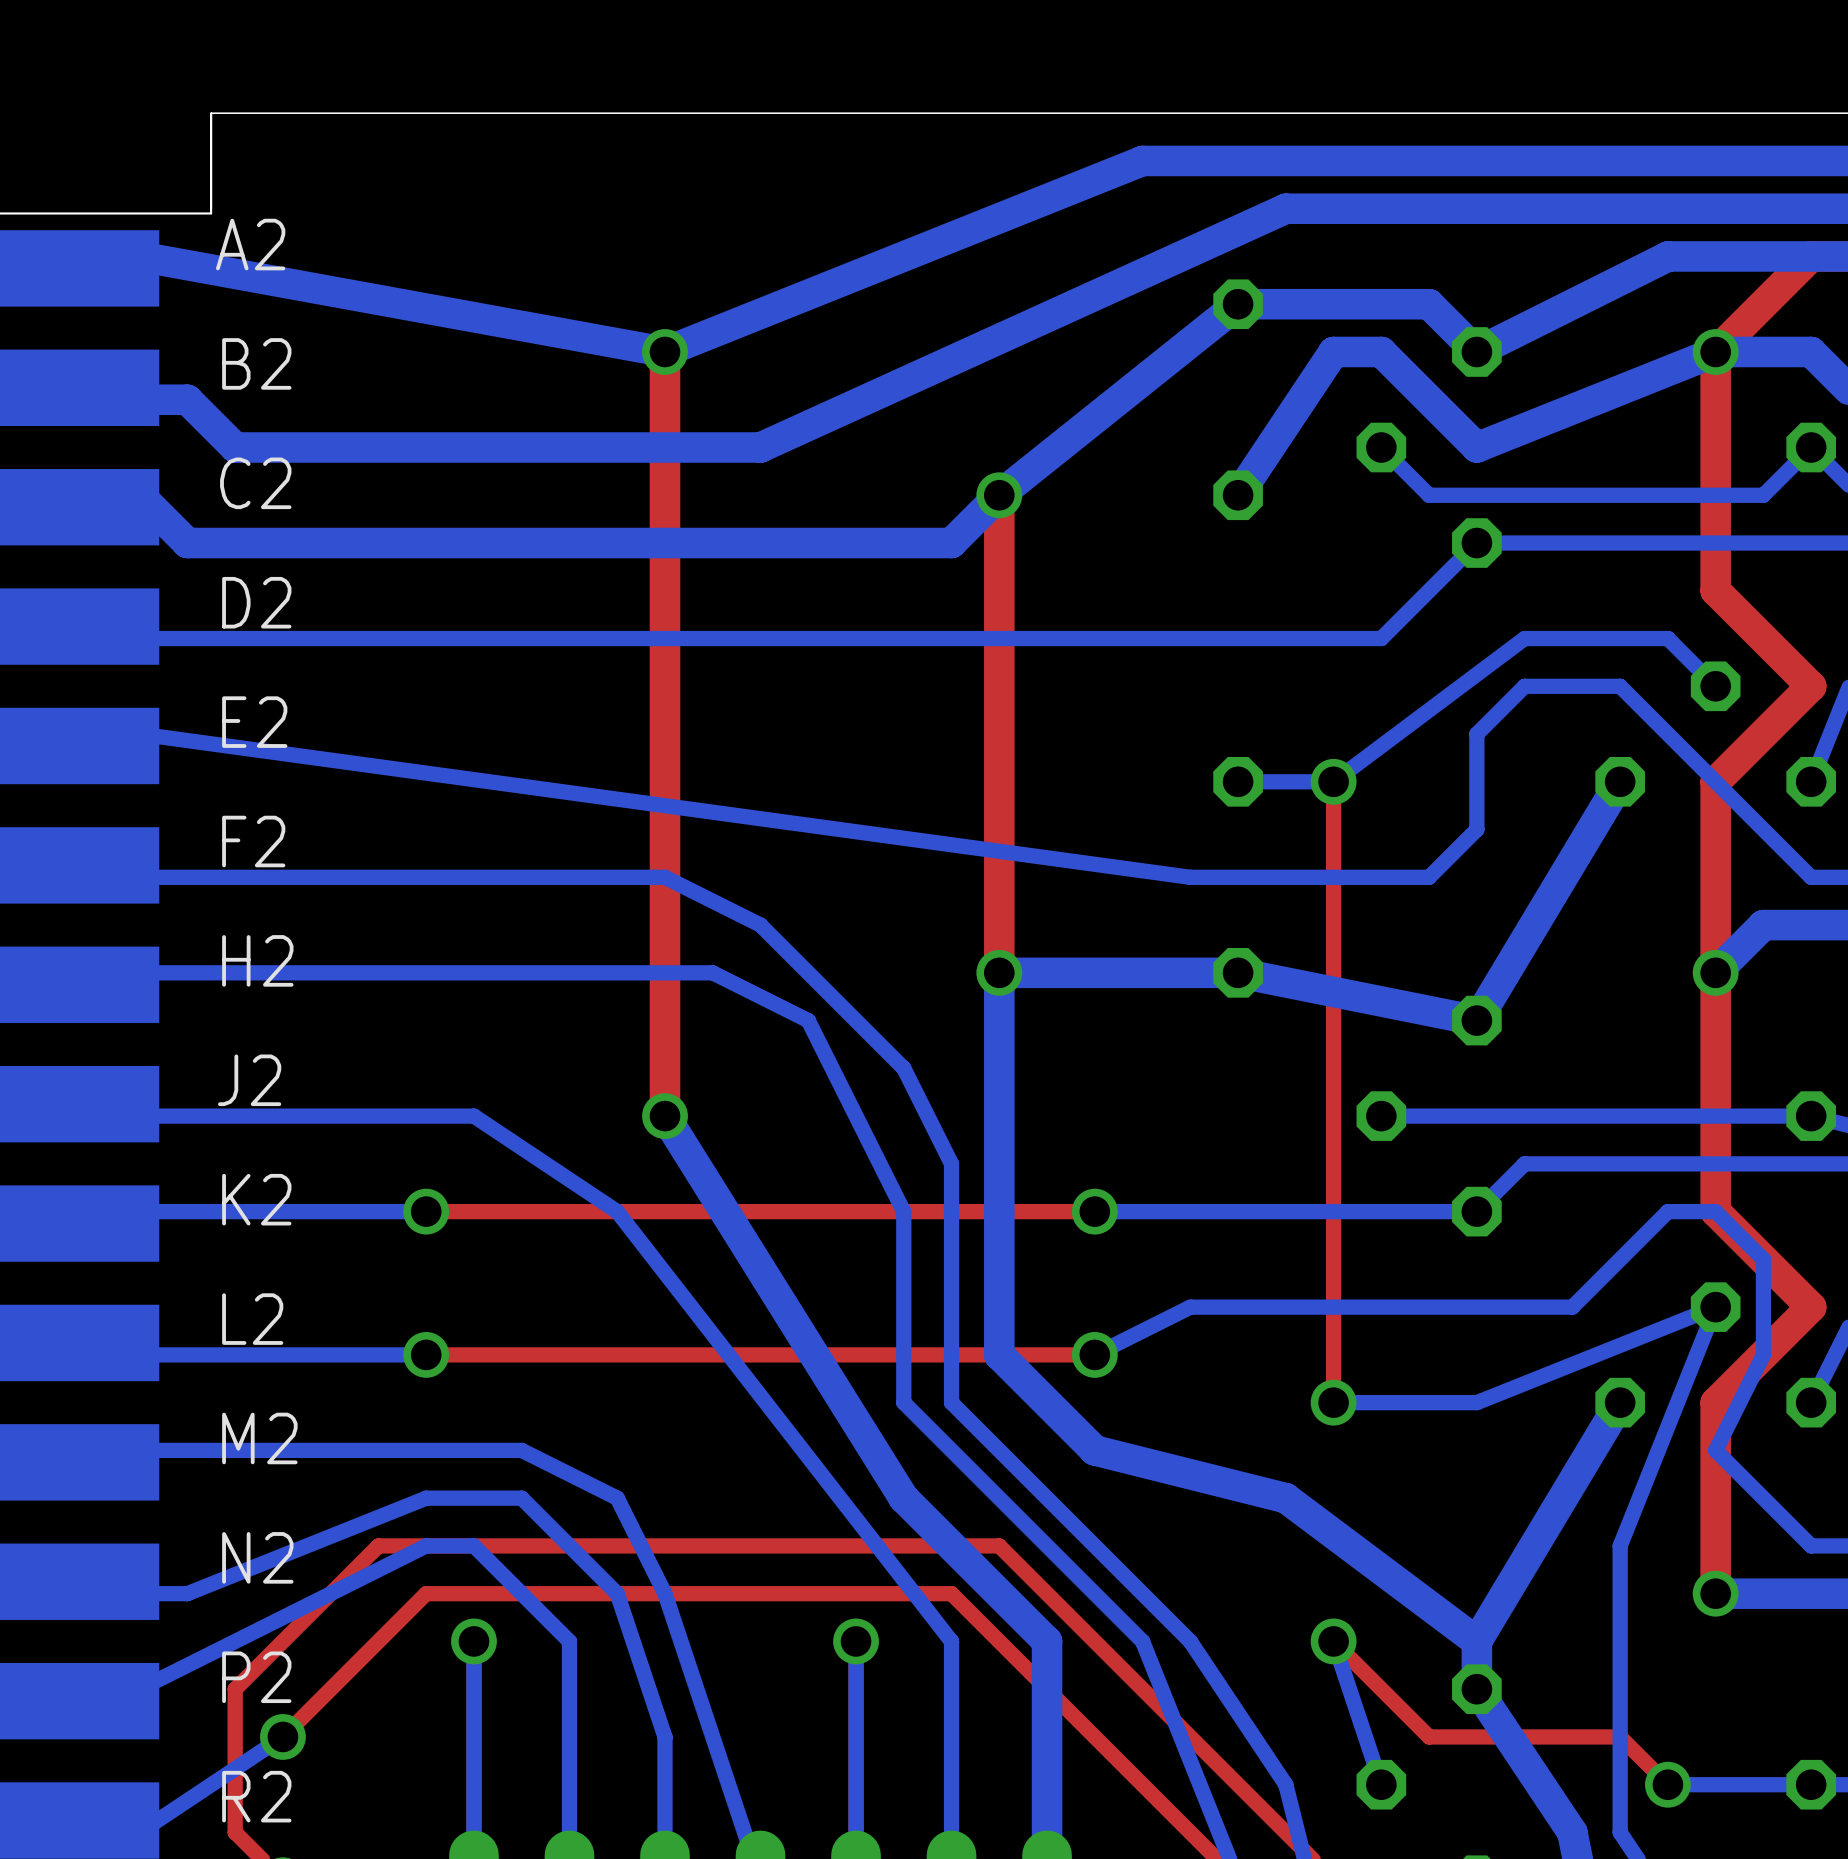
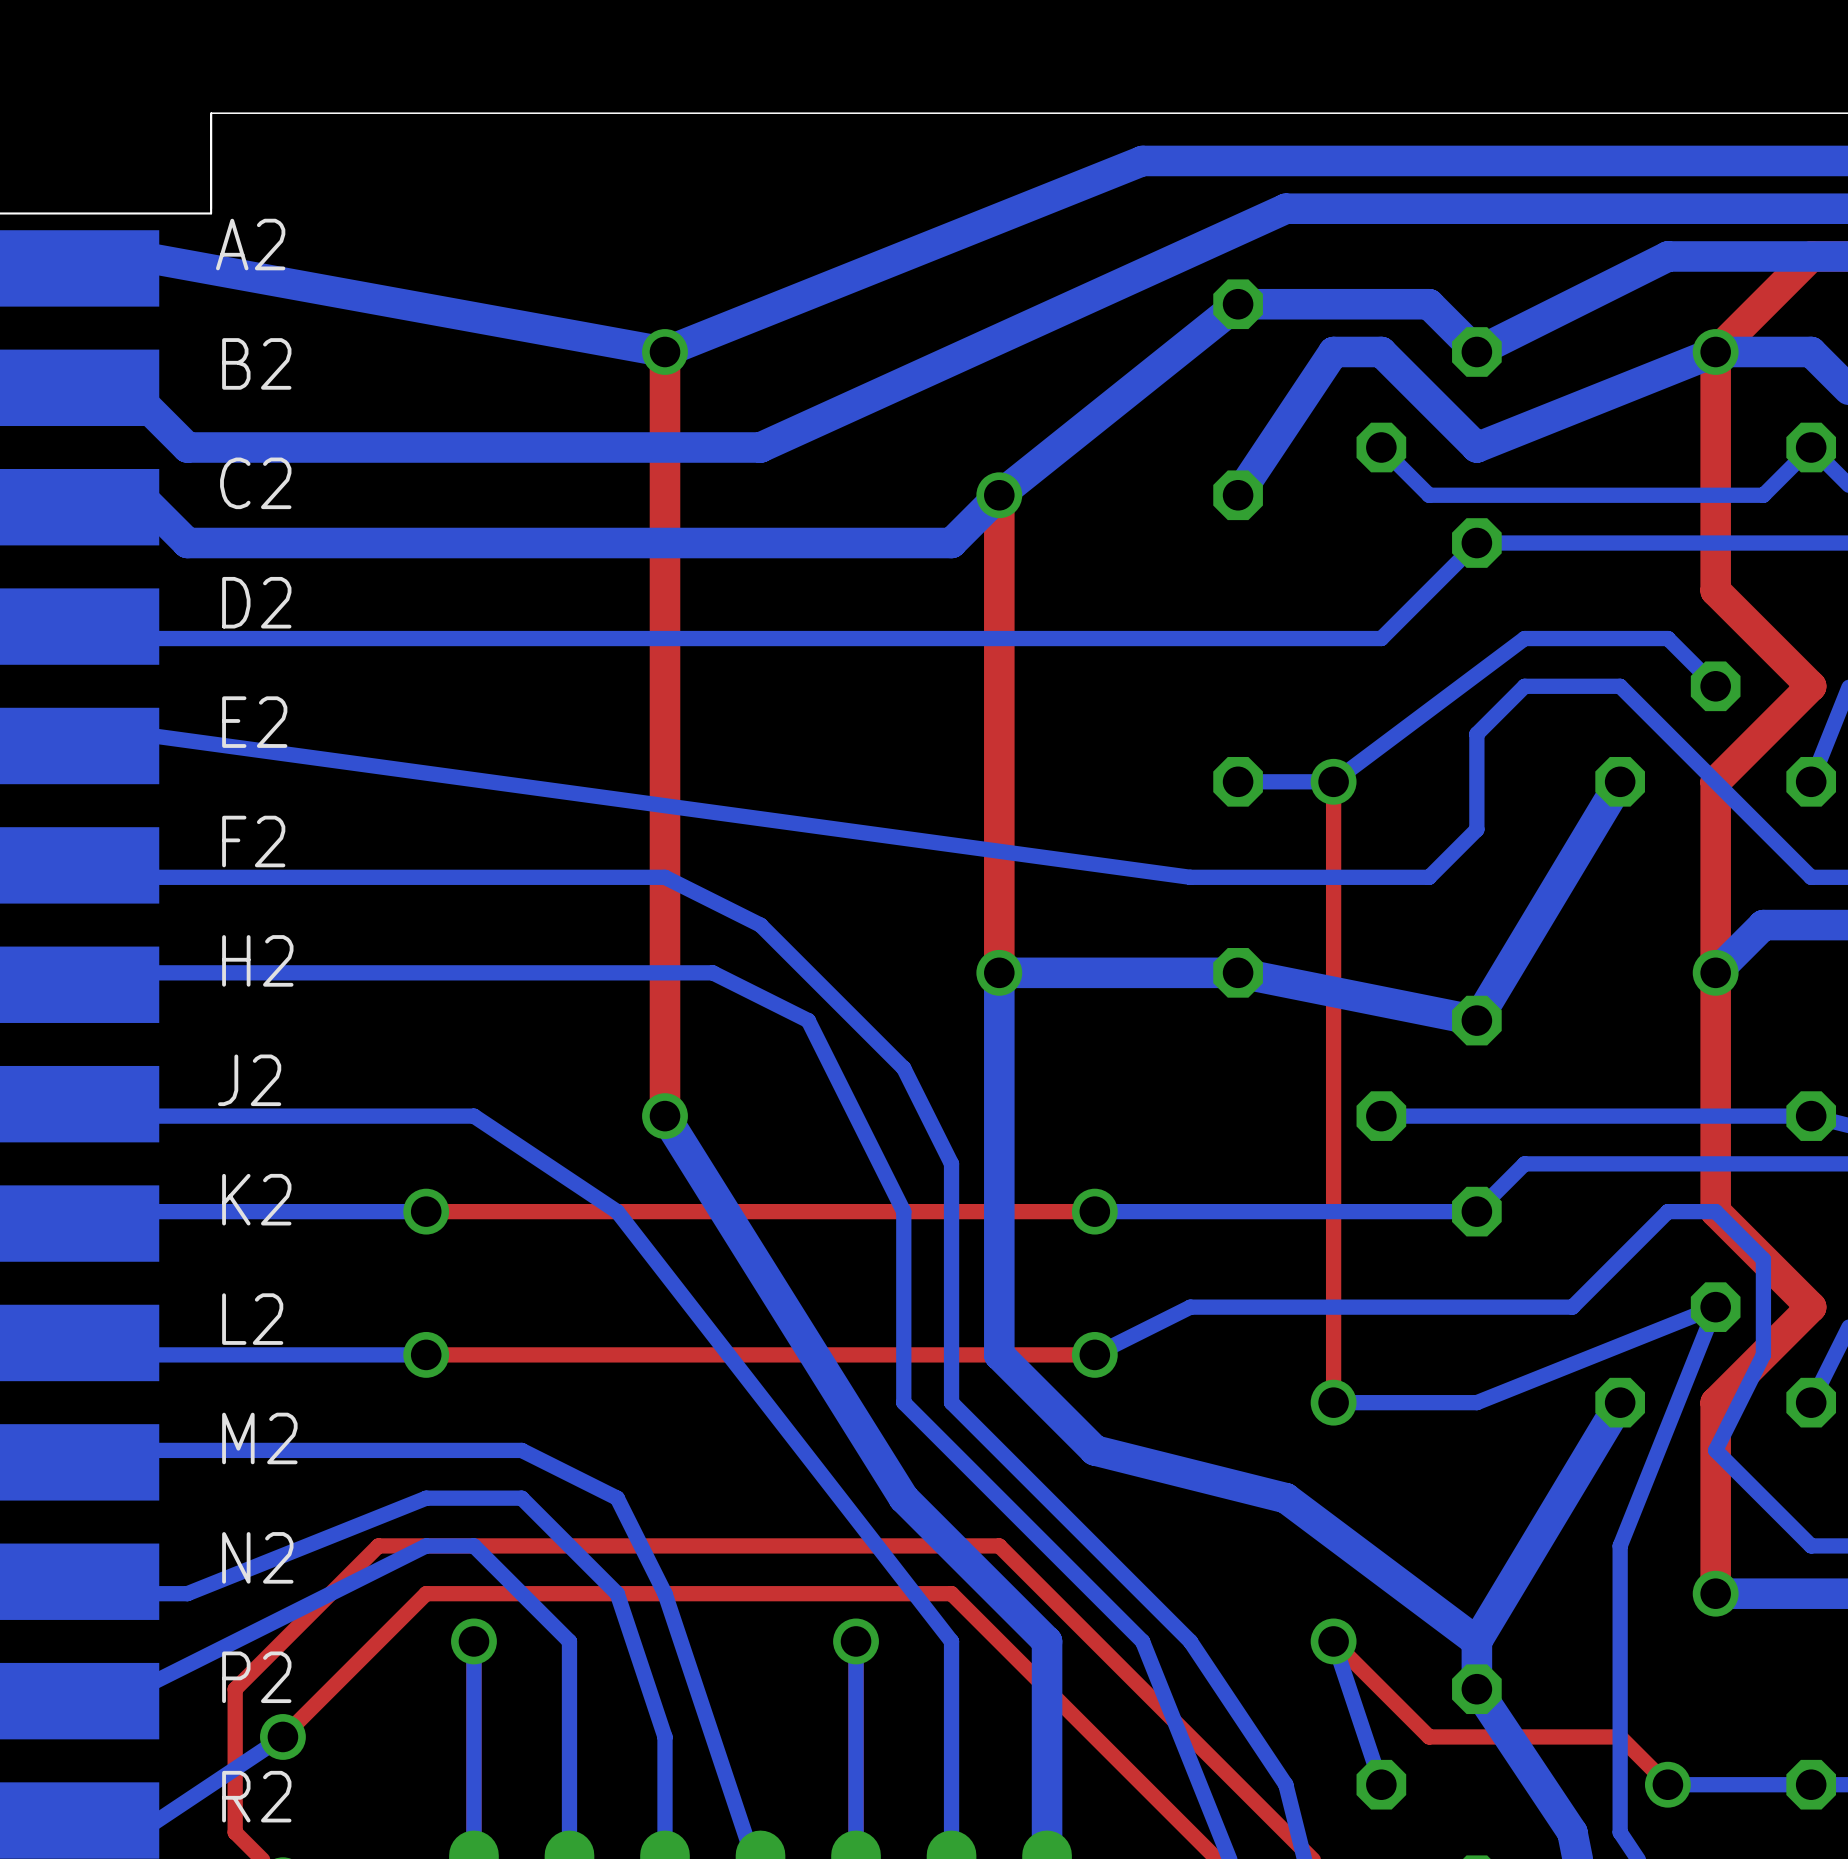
bottom track: (139, 399) (187, 399) (235, 447) -> (139, 399) (187, 447) (235, 447)

